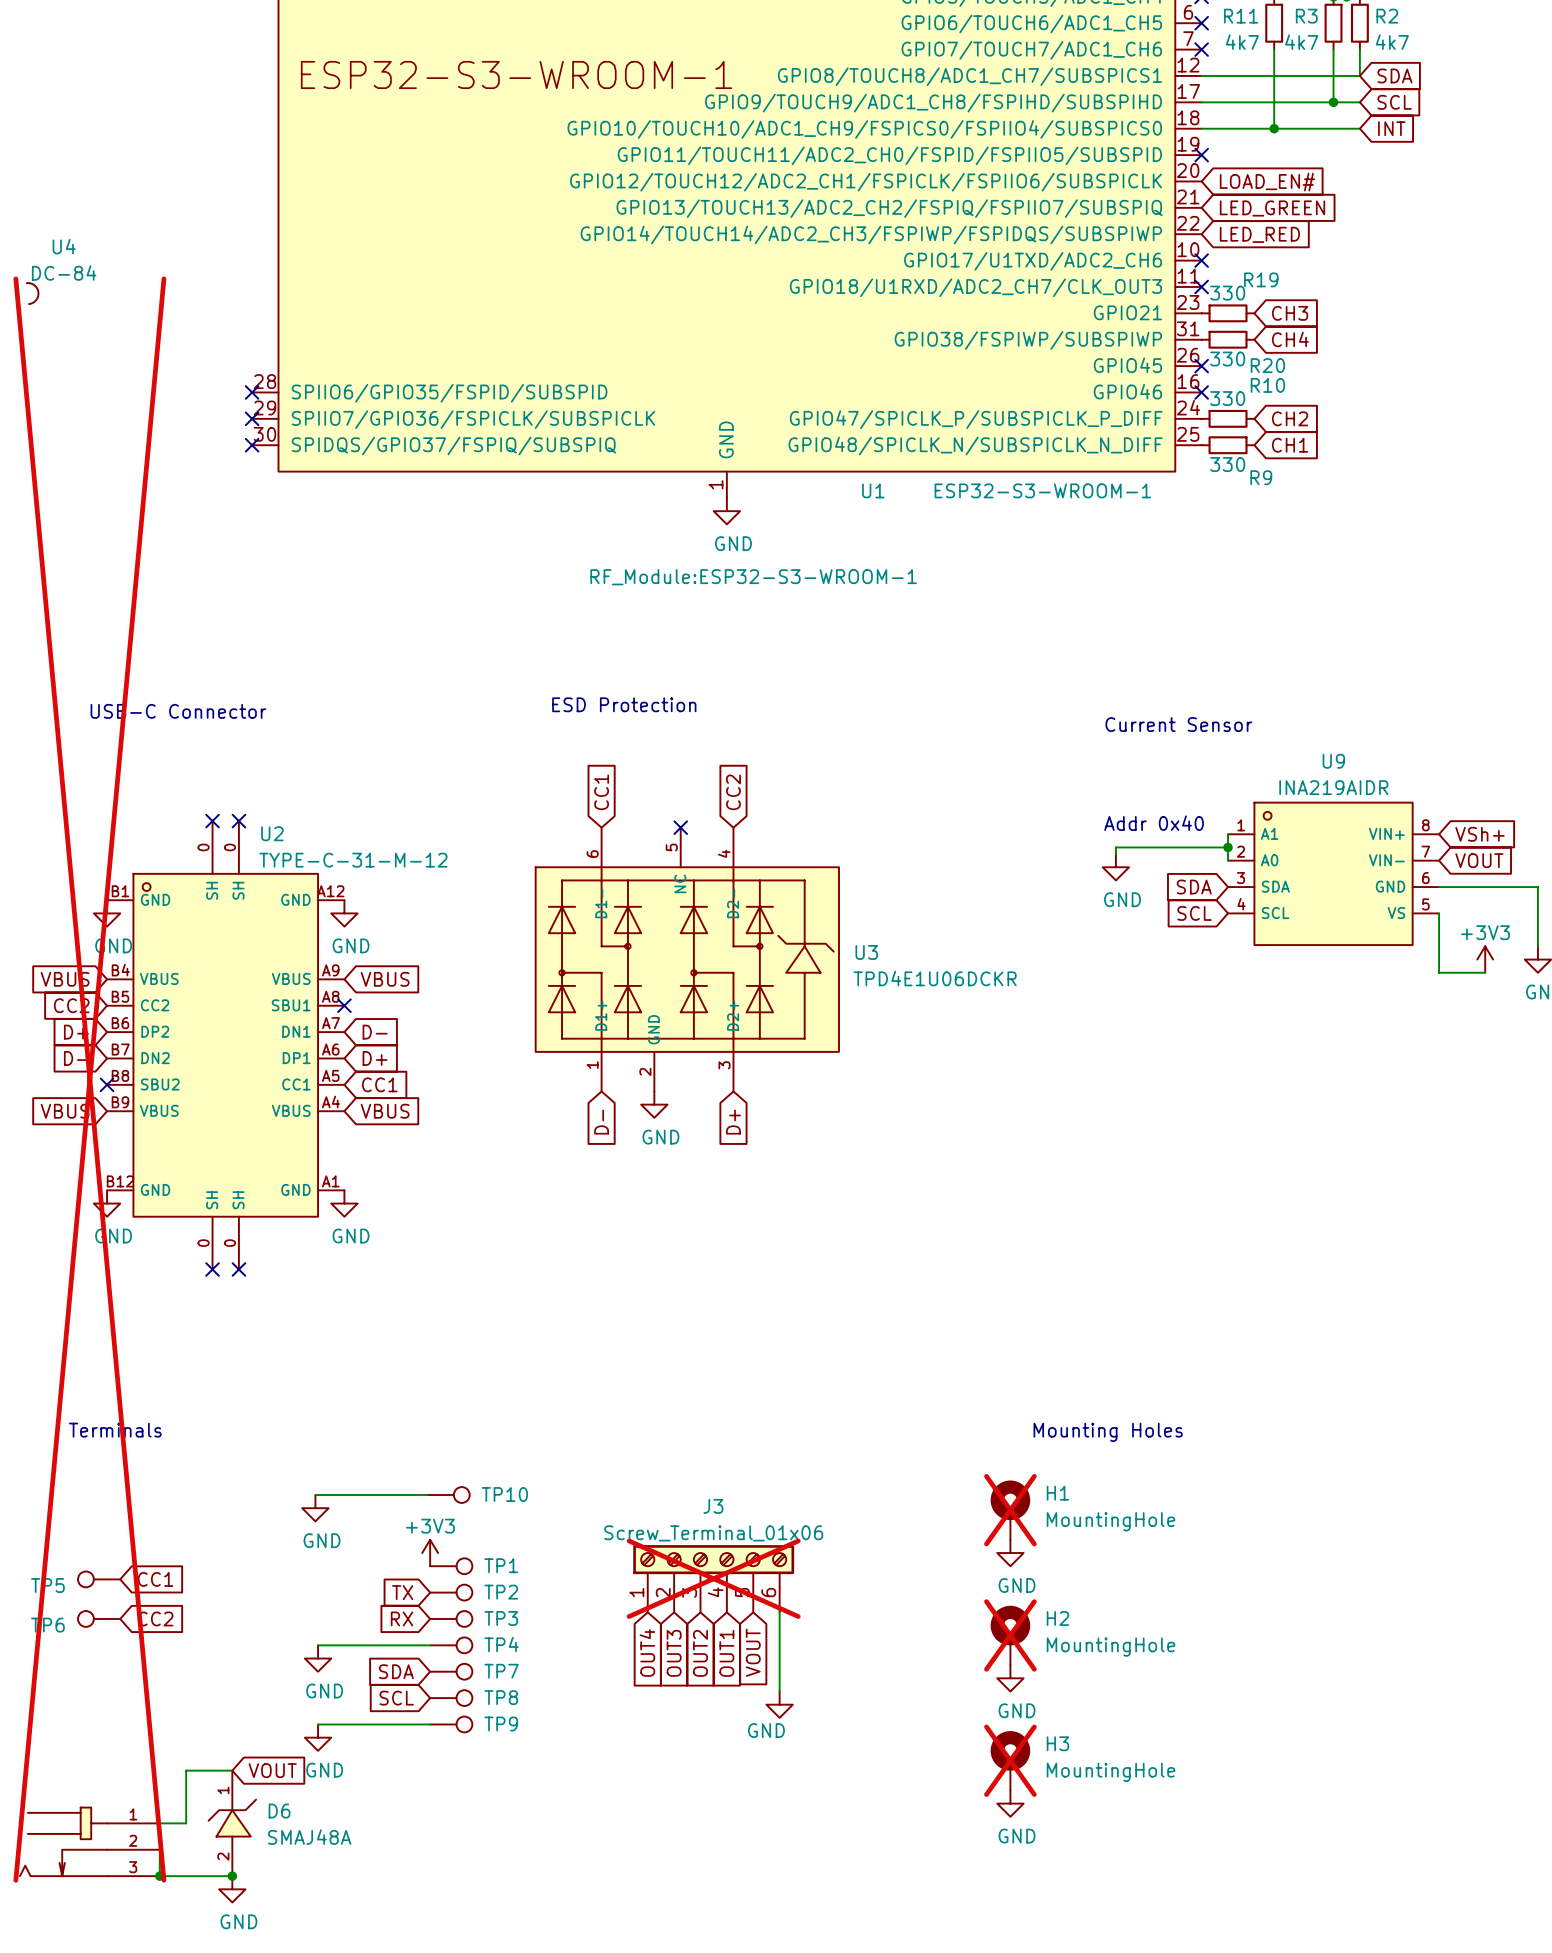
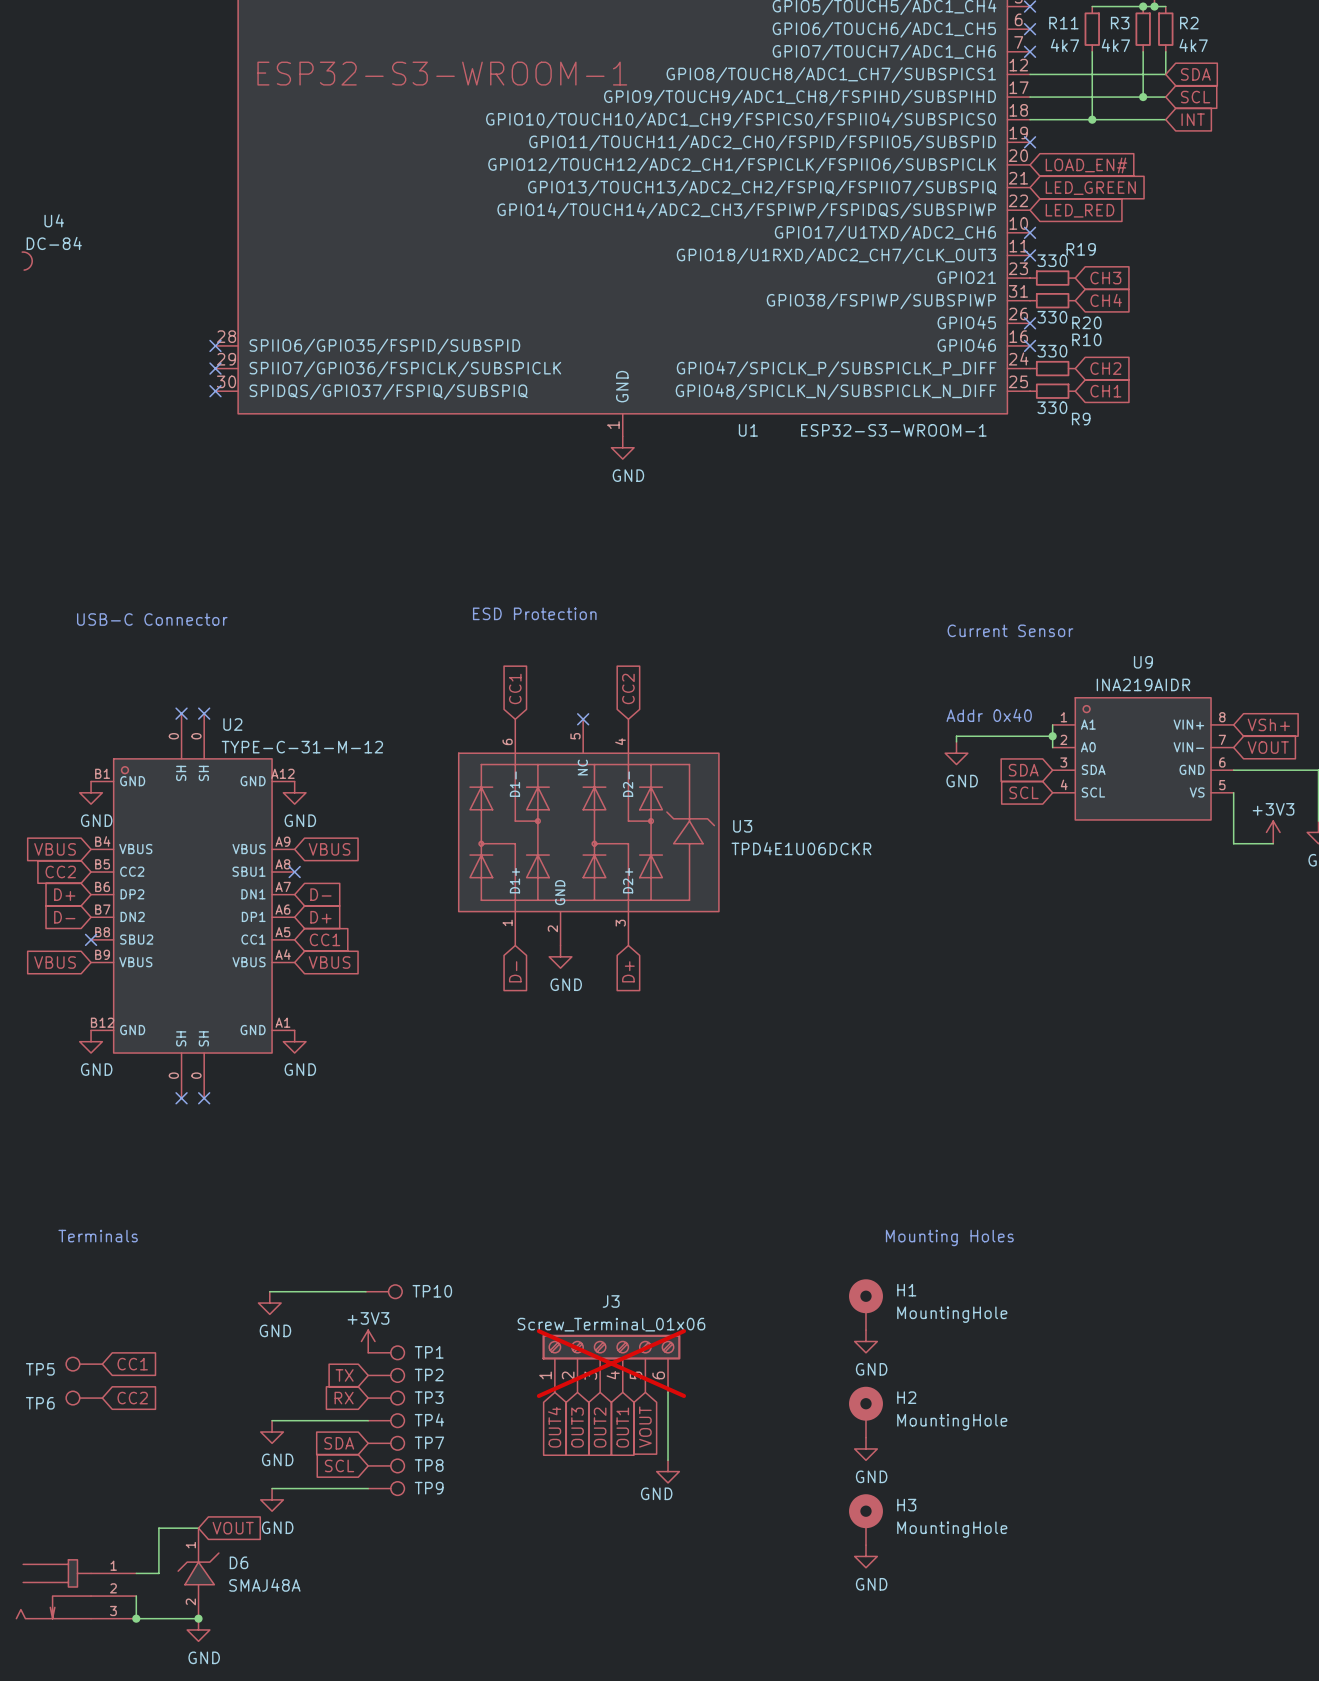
U1 text: RF_Module:ESP32-S3-WROOM-1 (753, 577) -> none
U4 do-not-place cross: (89, 1079) -> none
H1 do-not-place cross: (1010, 1510) -> none
H2 do-not-place cross: (1010, 1635) -> none
H3 do-not-place cross: (1010, 1760) -> none

